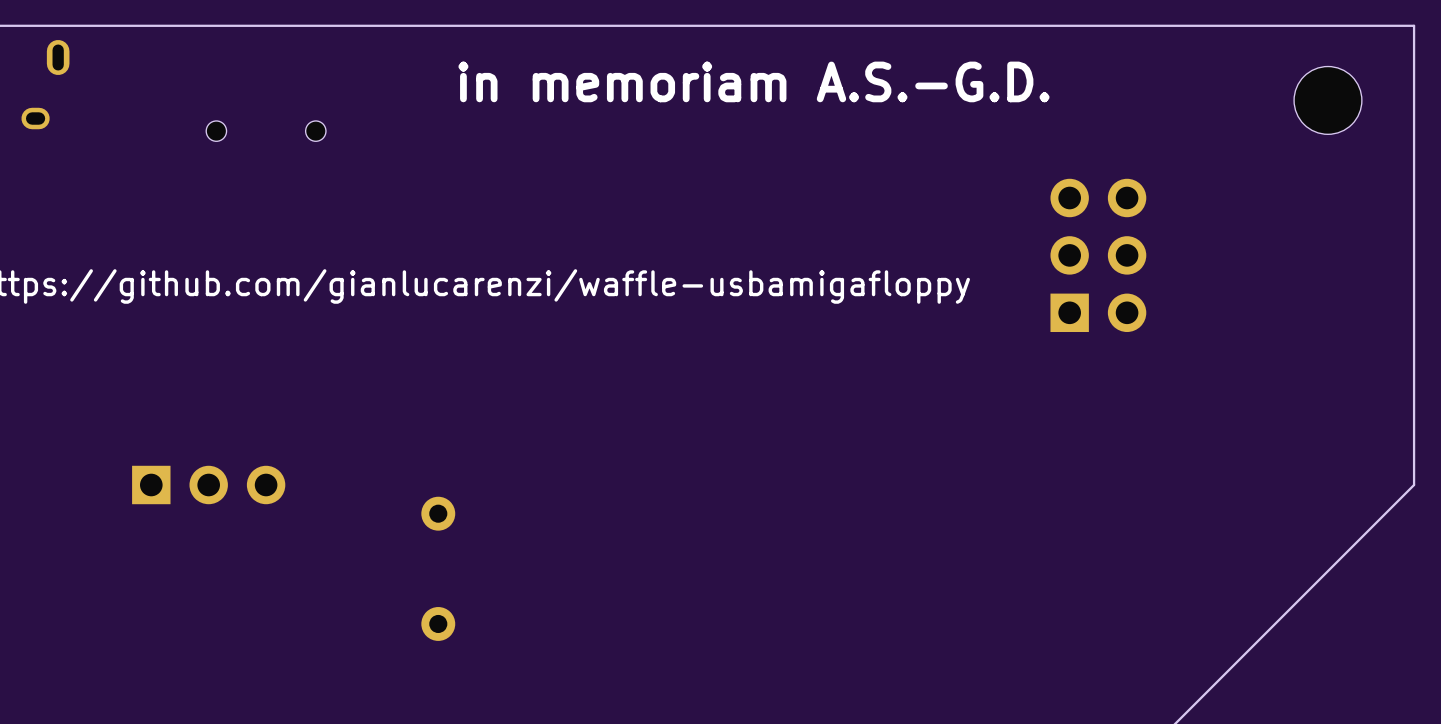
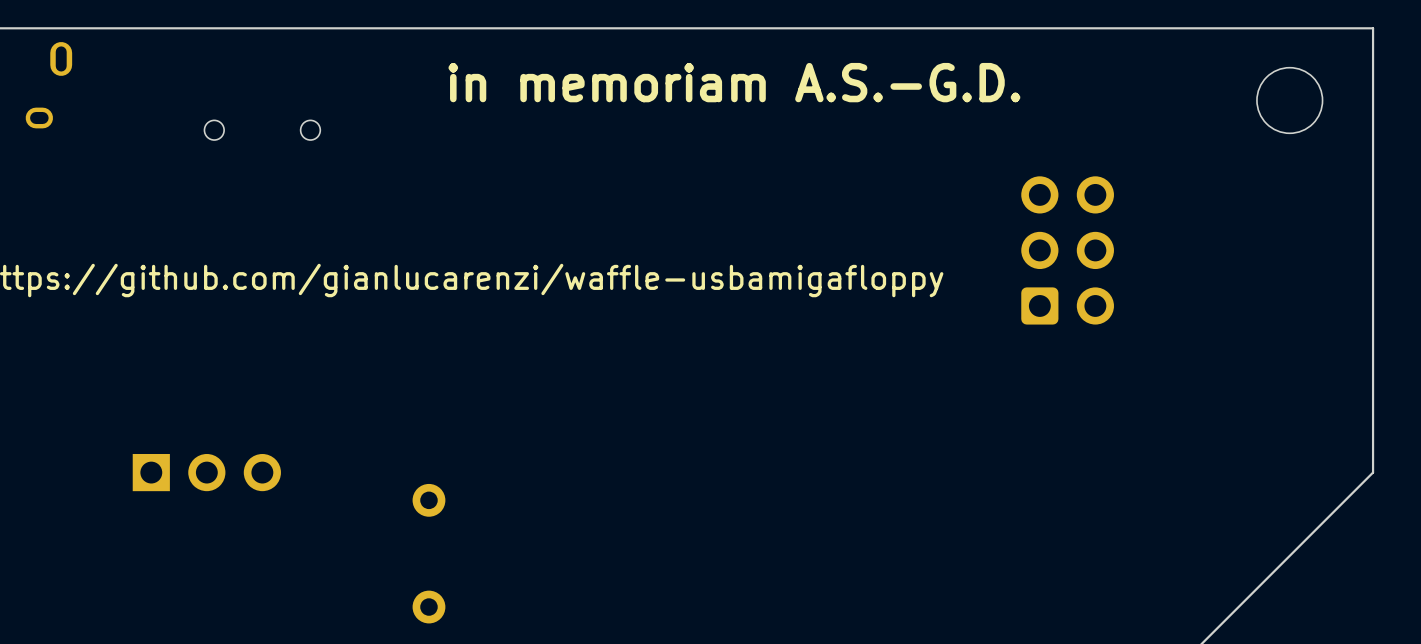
part footprint: [1050, 178, 1147, 333] -> [1021, 176, 1114, 325]

